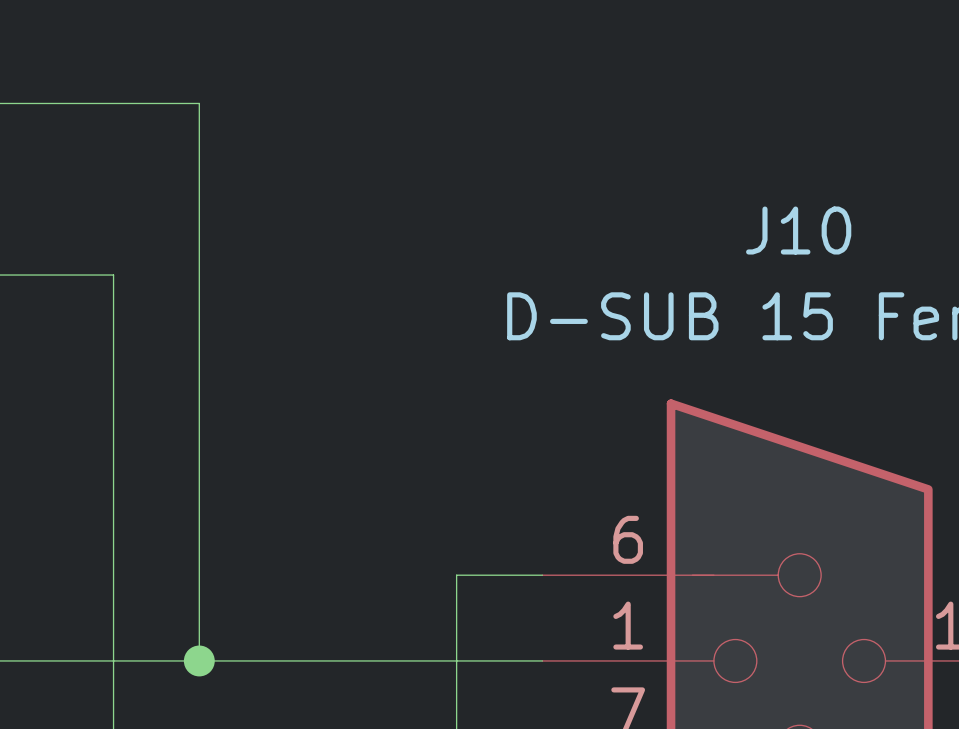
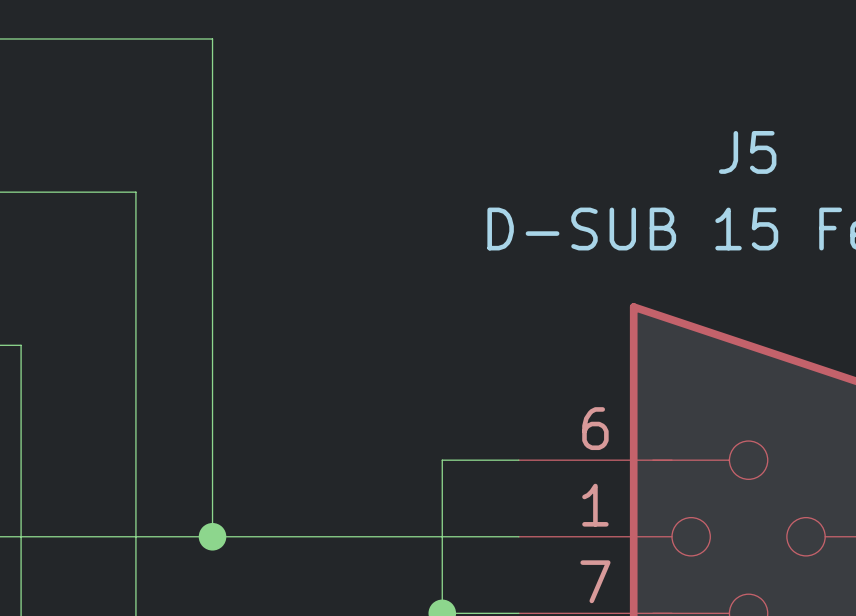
J10 name: J10 (798, 230) -> J5 (747, 152)

